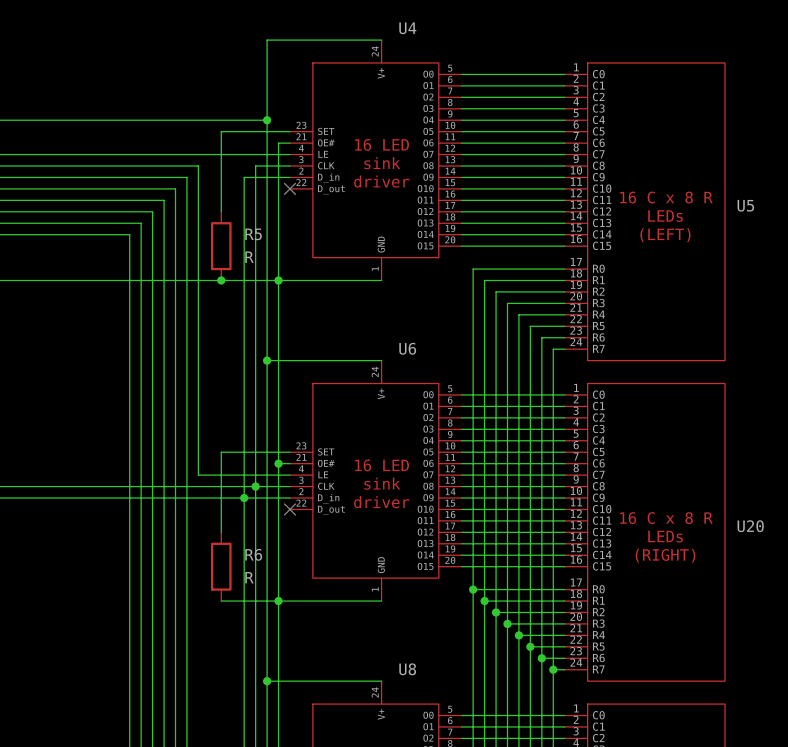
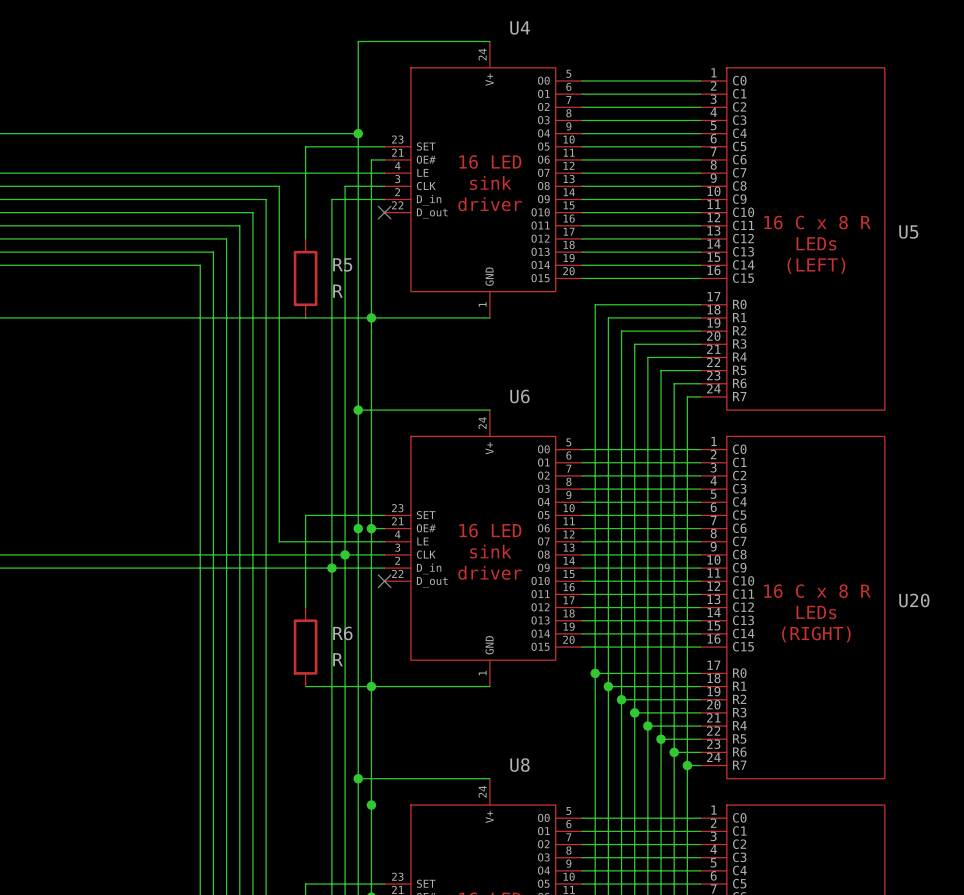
junction: (221, 280) -> none
junction: none -> (358, 528)
junction: none -> (371, 805)

